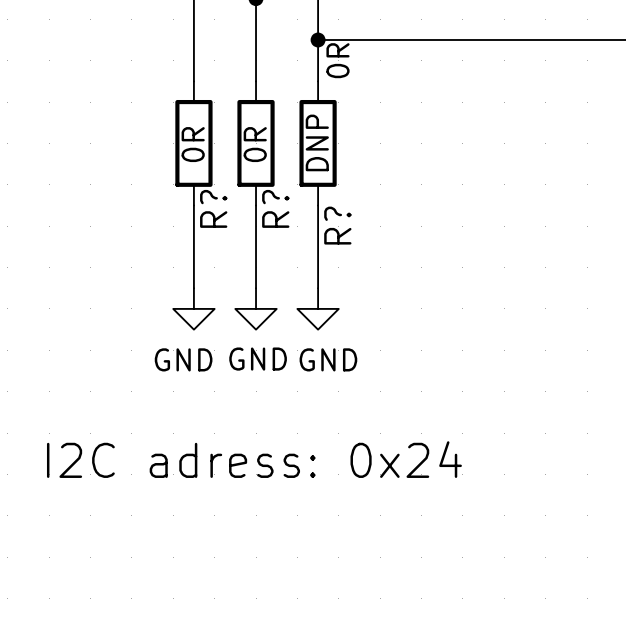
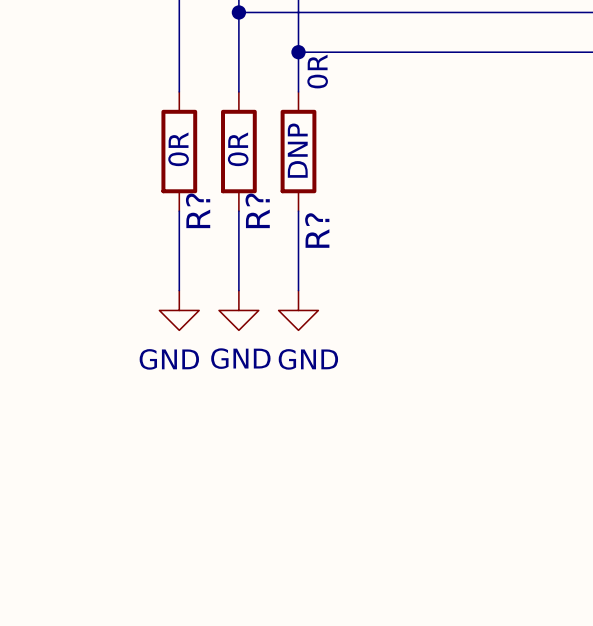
text: I2C adress: 0x24 (254, 459) -> none

